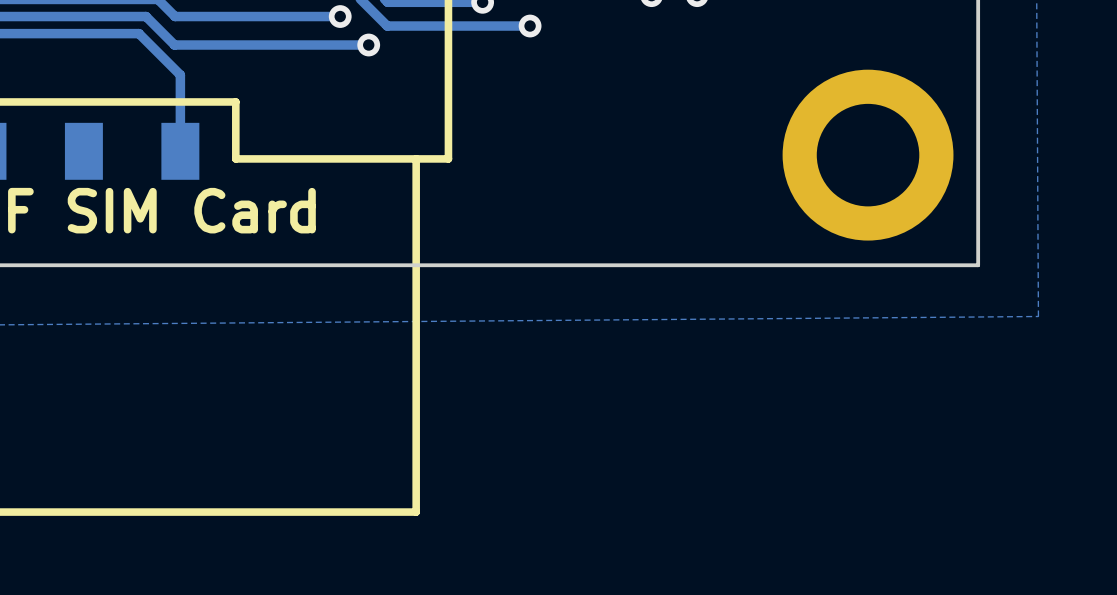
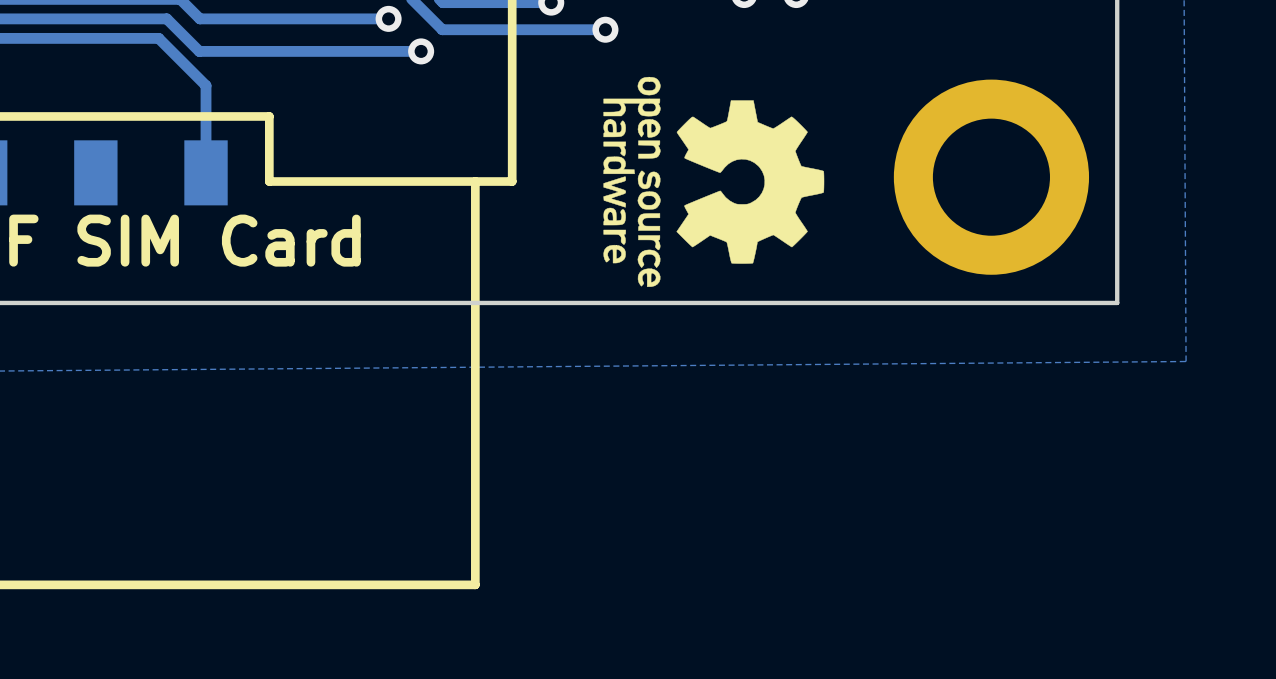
drawing: none -> [603, 76, 825, 287]

